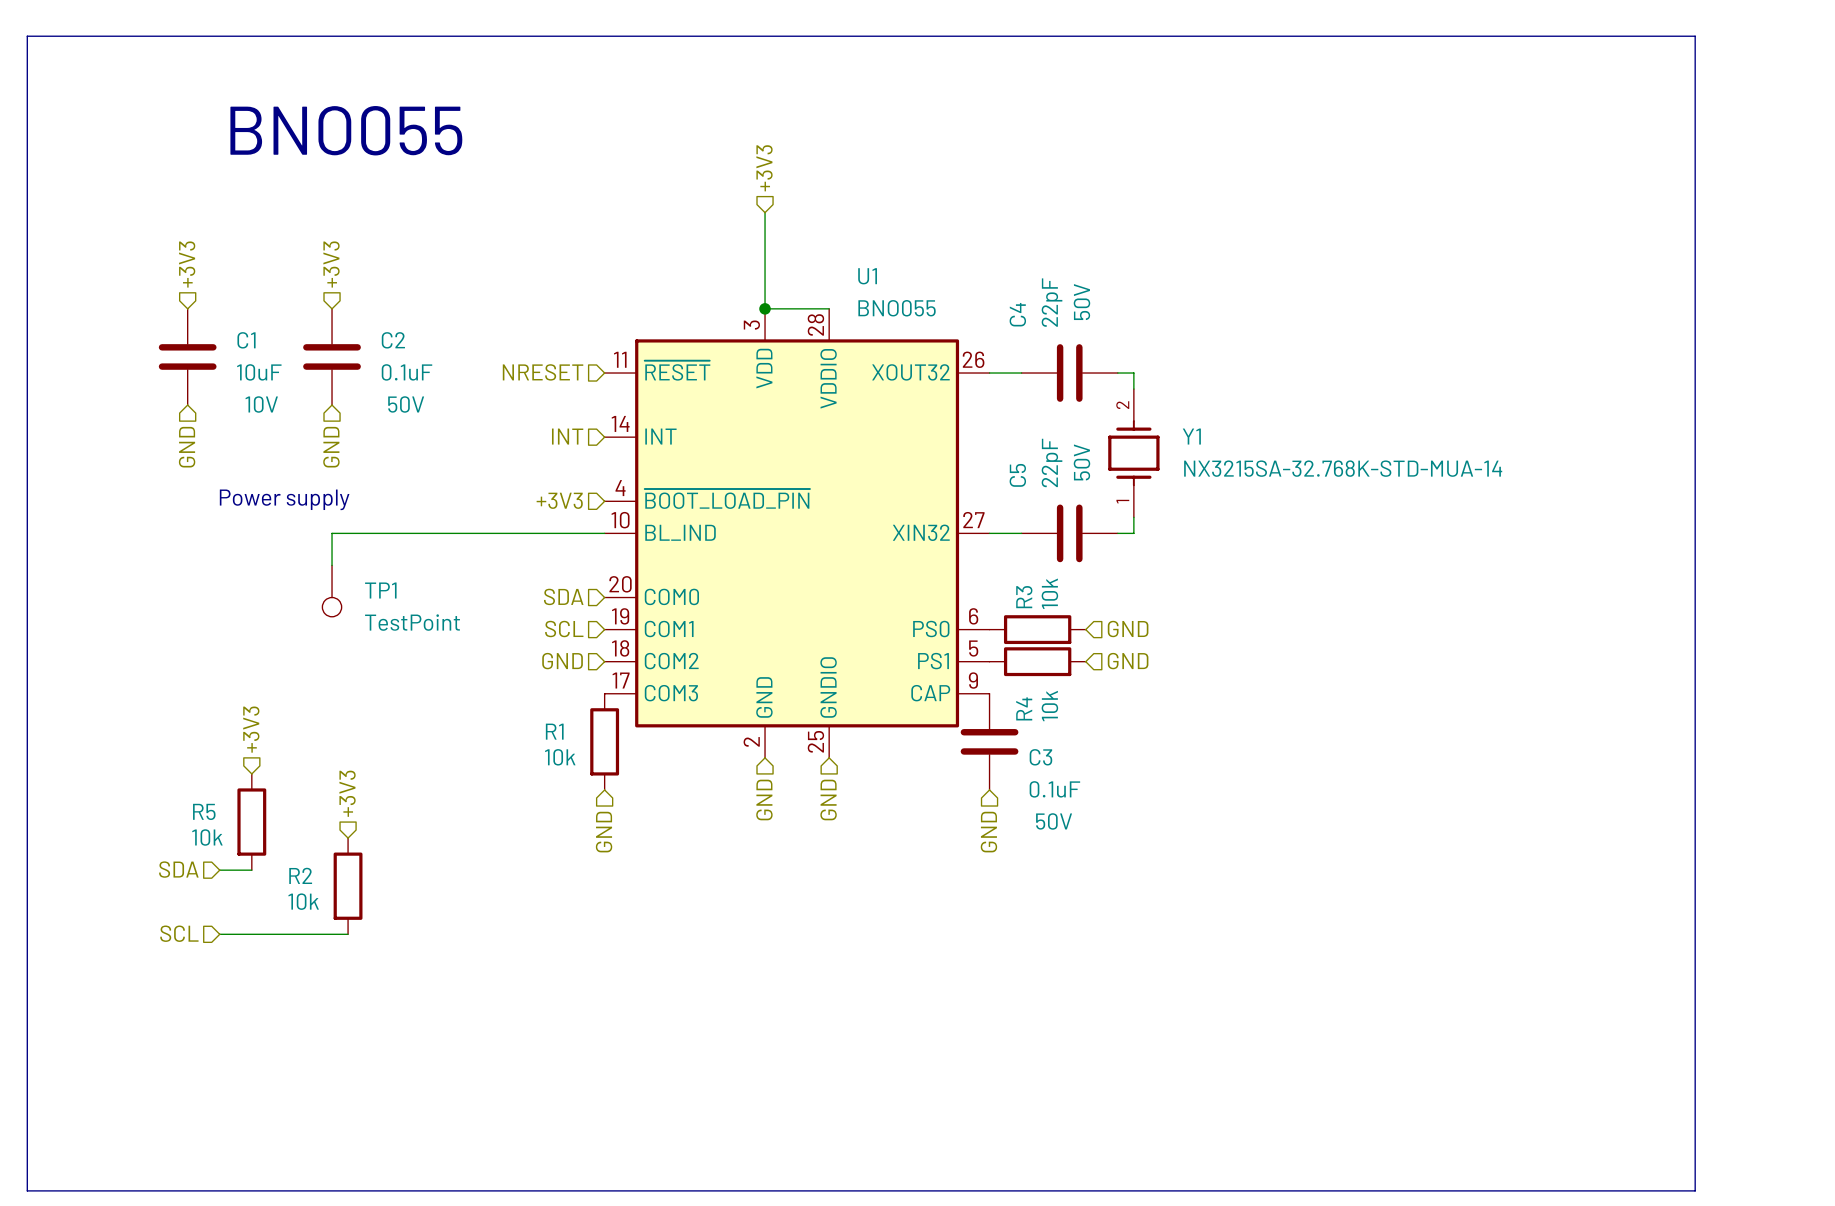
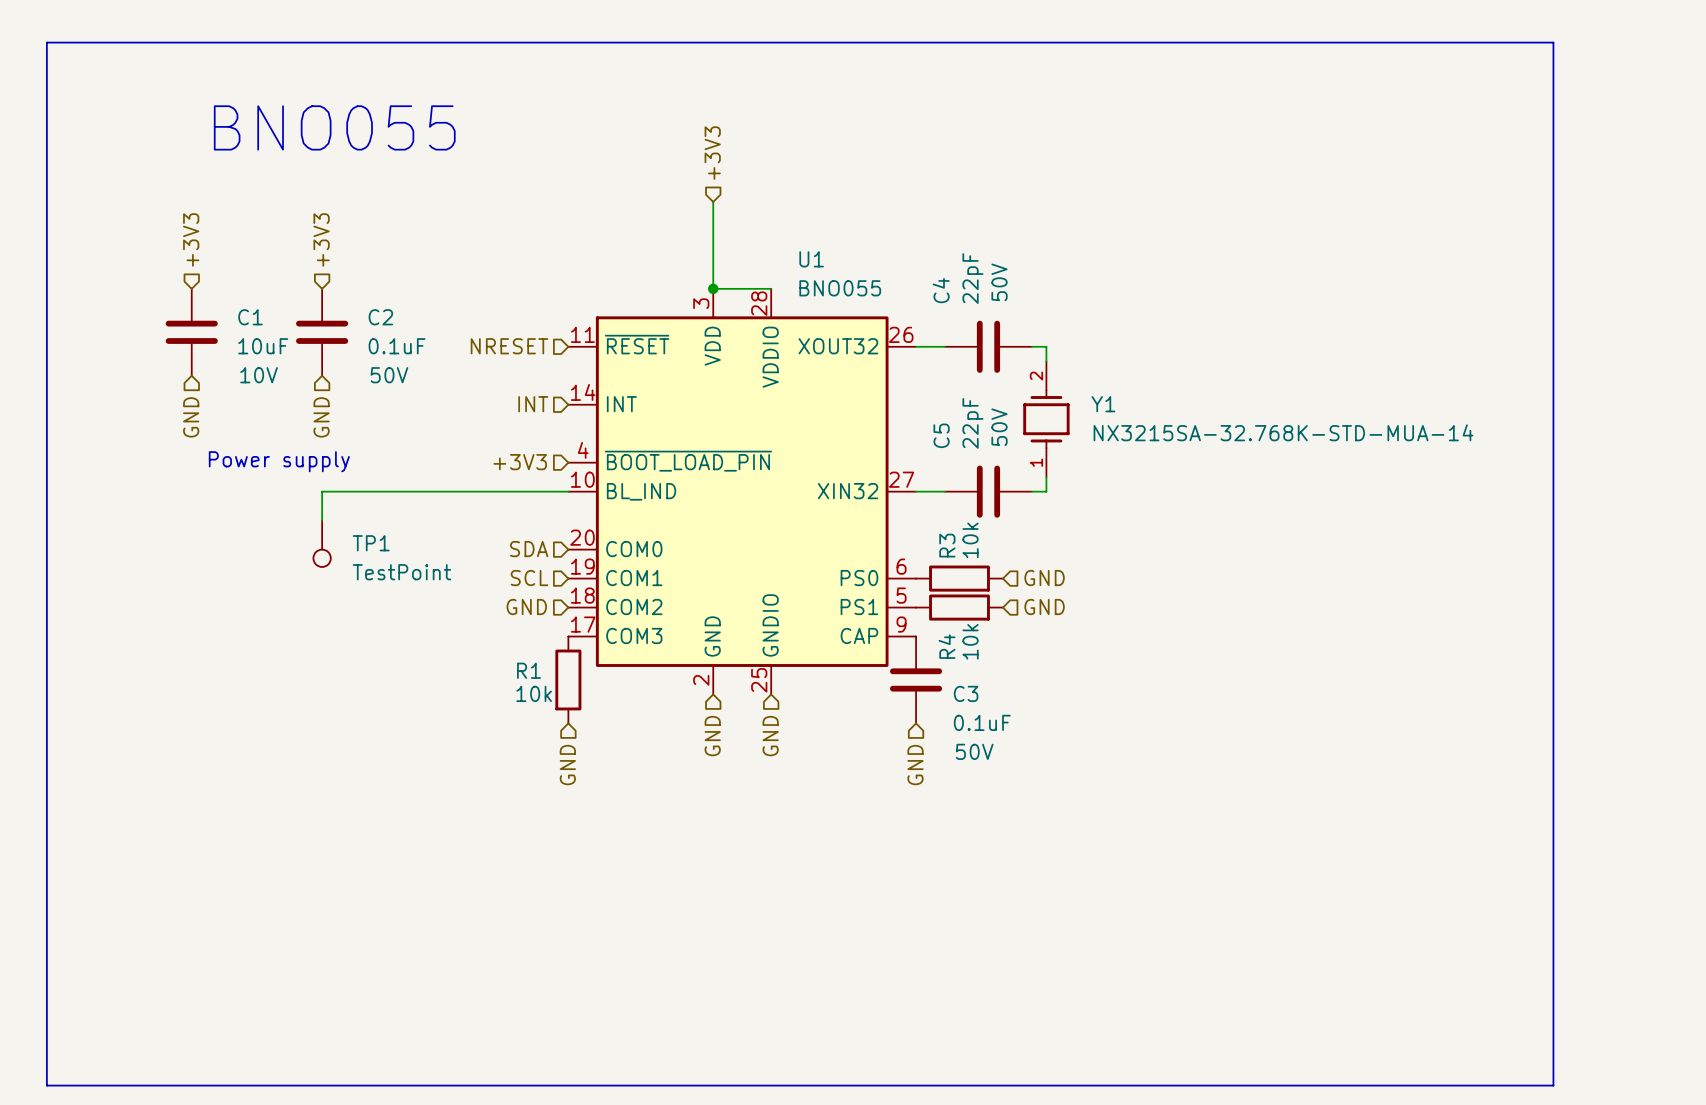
hierarchical label: +3V3 (251, 729) -> none
hierarchical label: +3V3 (347, 793) -> none
R5: 10k (251, 822) -> none
hierarchical label: SDA (178, 869) -> none
wire: (219, 870) (251, 870) -> none
R2: 10k (348, 886) -> none
hierarchical label: SCL (179, 933) -> none
wire: (219, 934) (348, 934) -> none

